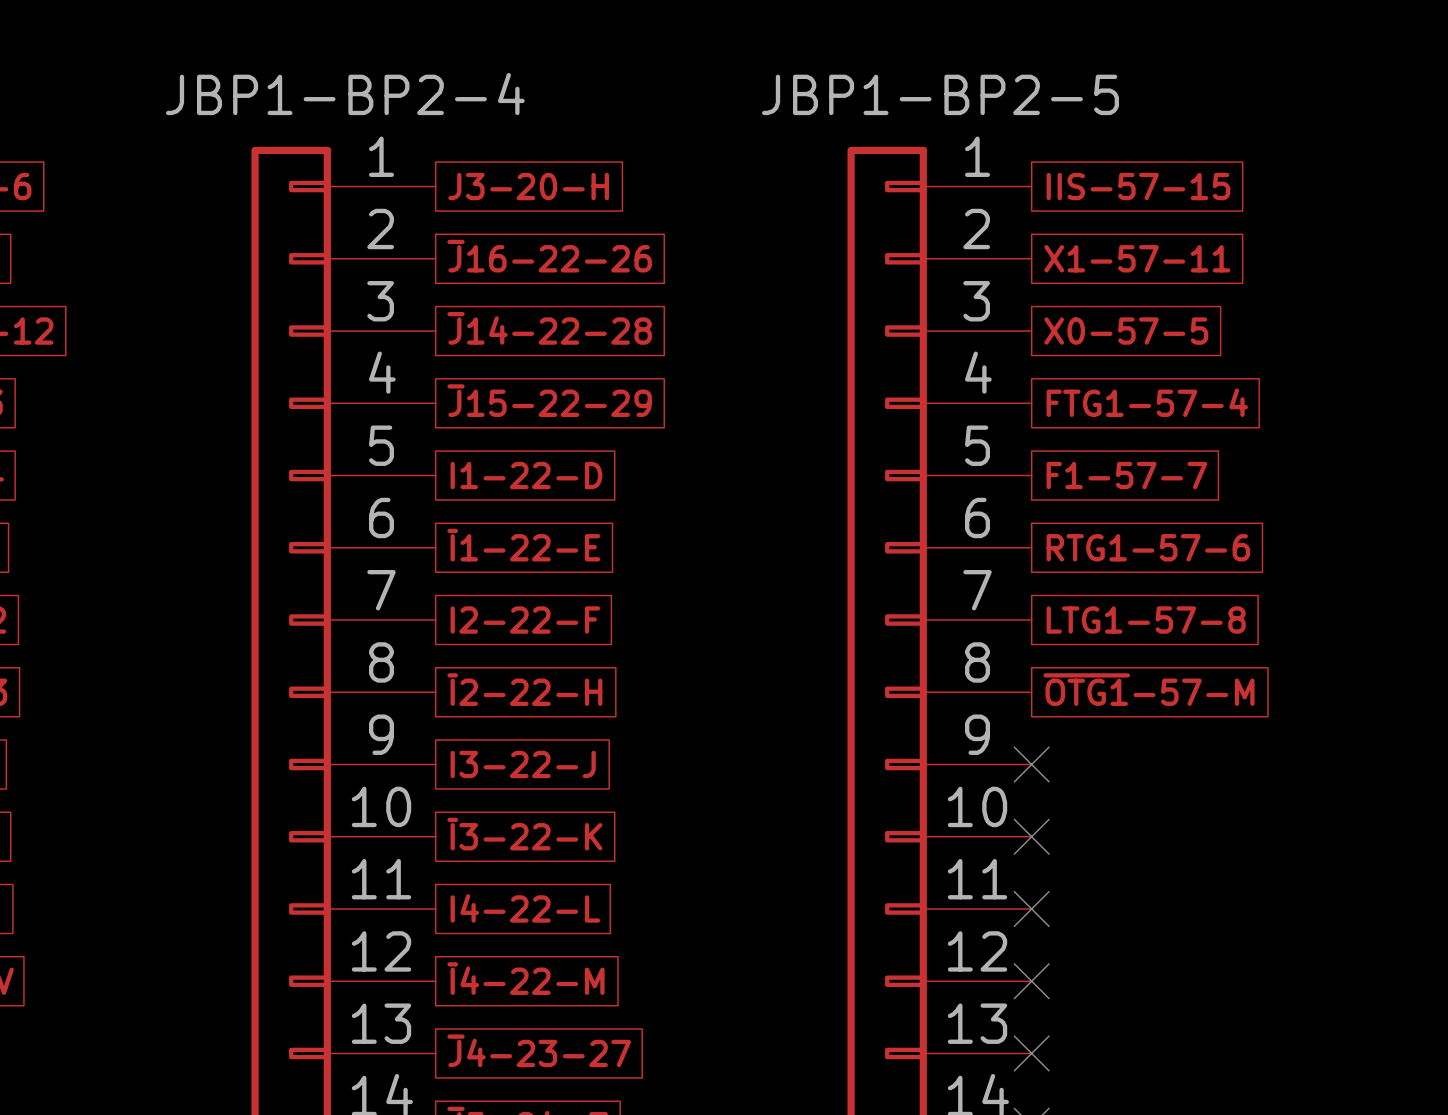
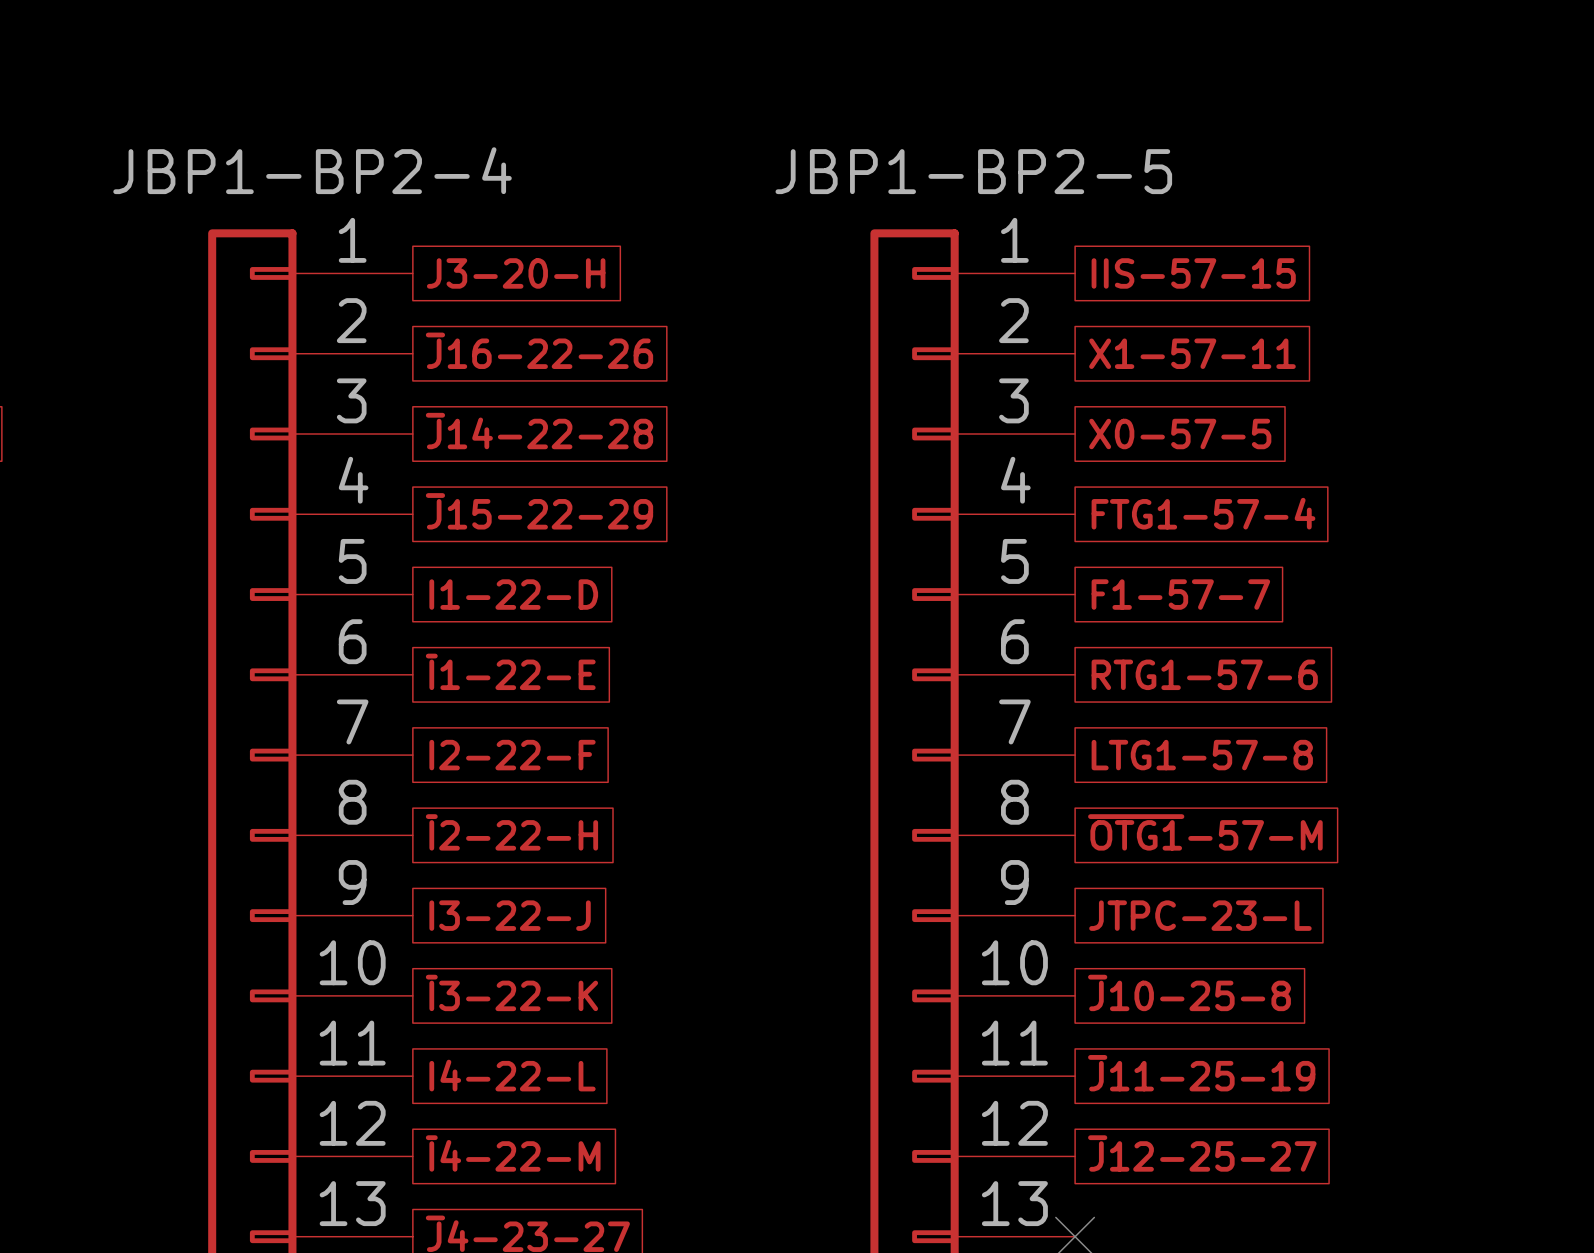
no-connect mark: (1031, 764) -> none
global label: none -> JTPC-23-L (1200, 915)
global label: none -> ~{J}10-25-8 (1189, 992)
no-connect mark: (1031, 836) -> none
global label: none -> ~{J}11-25-19 (1201, 1073)
no-connect mark: (1031, 908) -> none
global label: none -> ~{J}12-25-27 (1202, 1153)
no-connect mark: (1031, 981) -> none

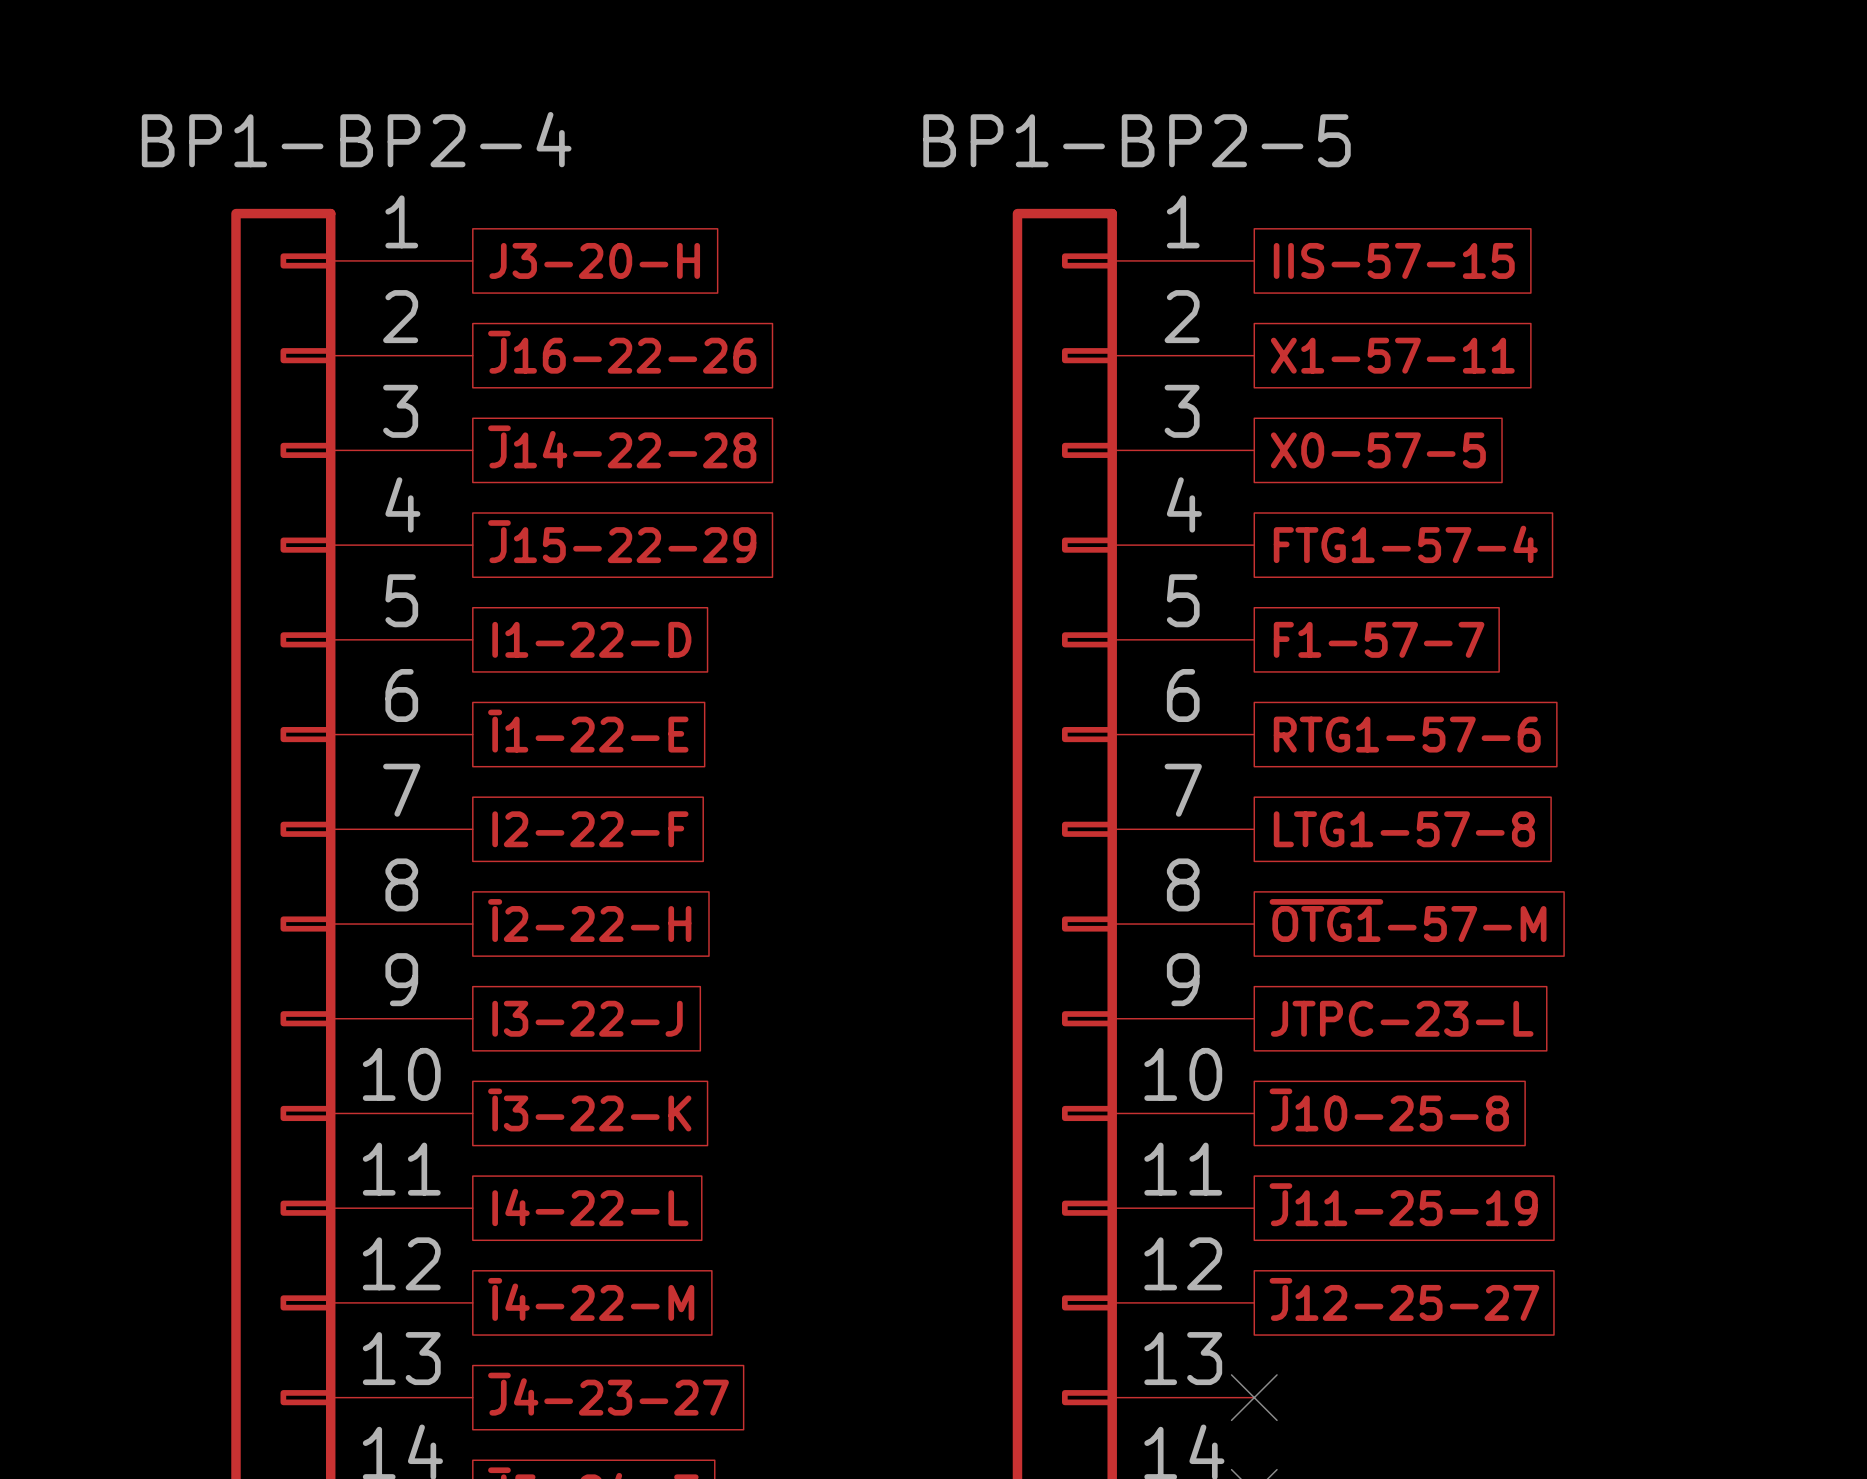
JBP1-BP2-4 name: JBP1-BP2-4 (312, 170) -> BP1-BP2-4 (356, 139)
JBP1-BP2-5 name: JBP1-BP2-5 (973, 171) -> BP1-BP2-5 (1137, 140)

